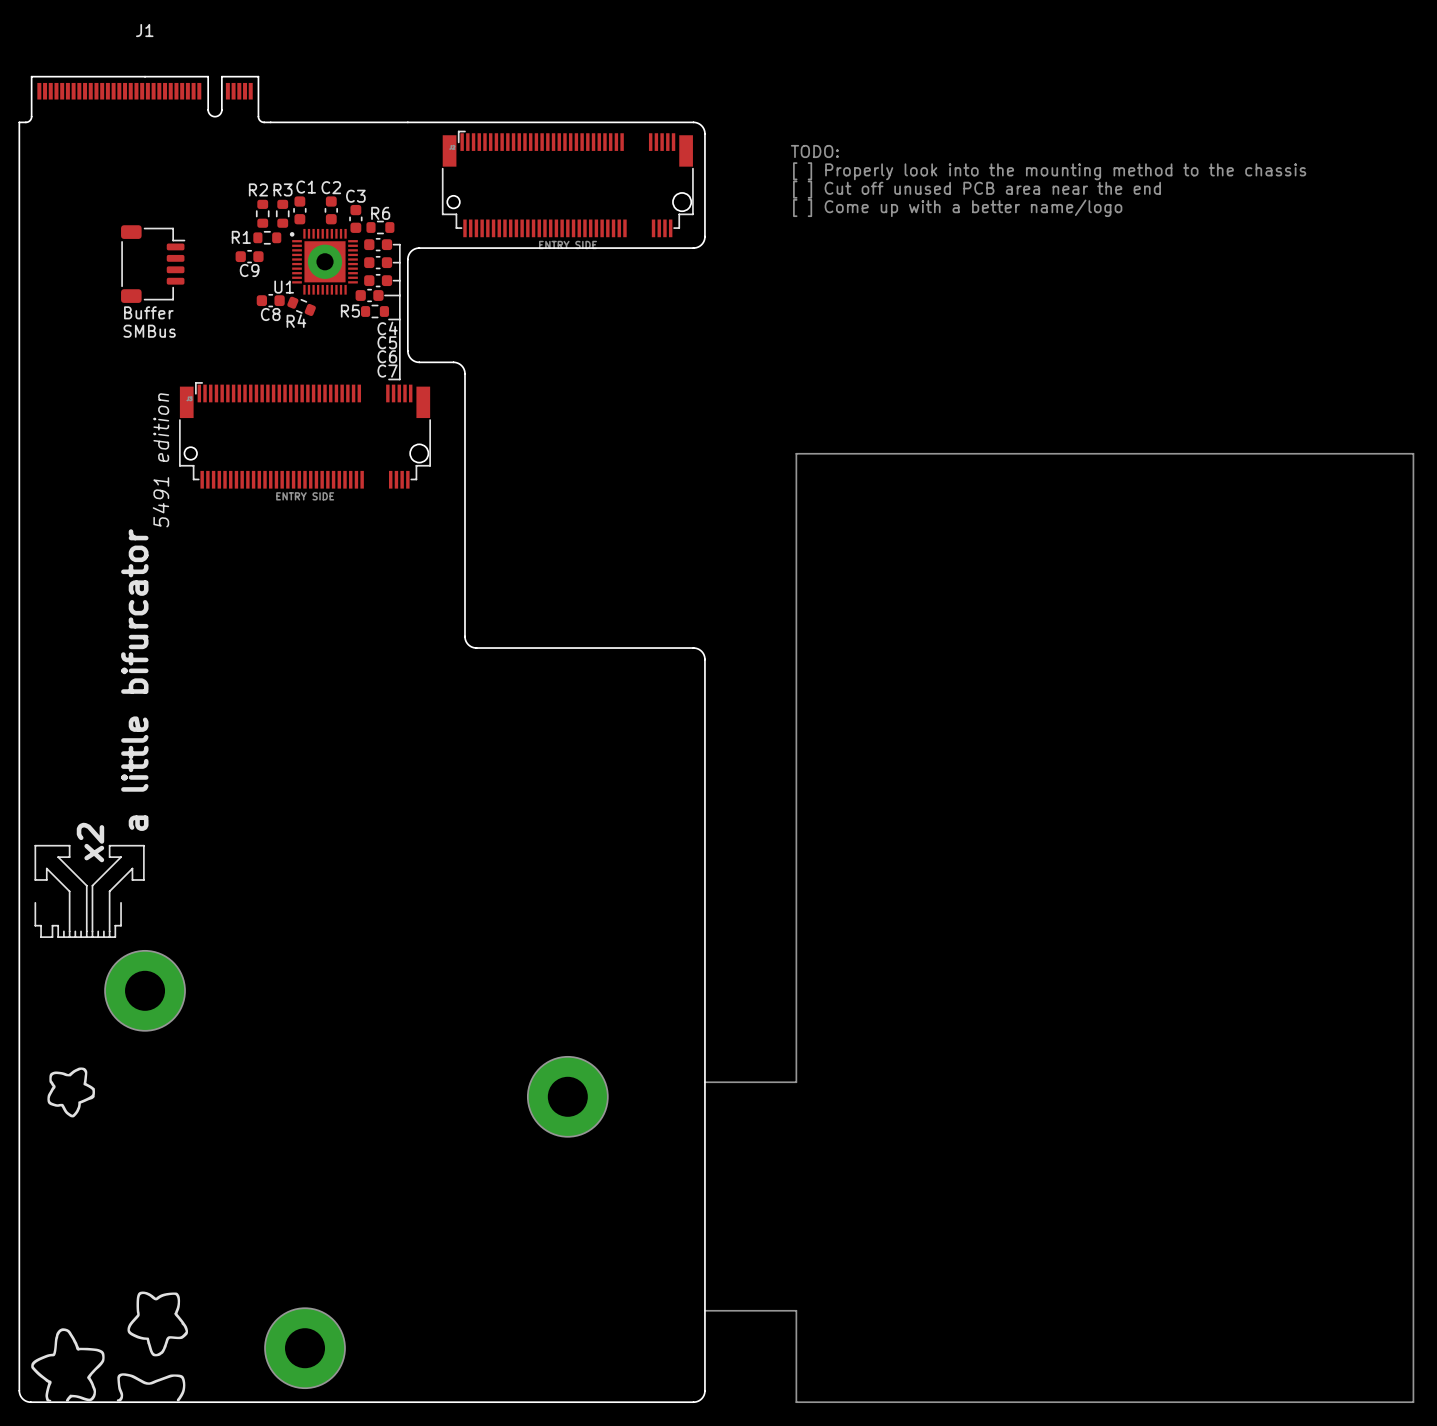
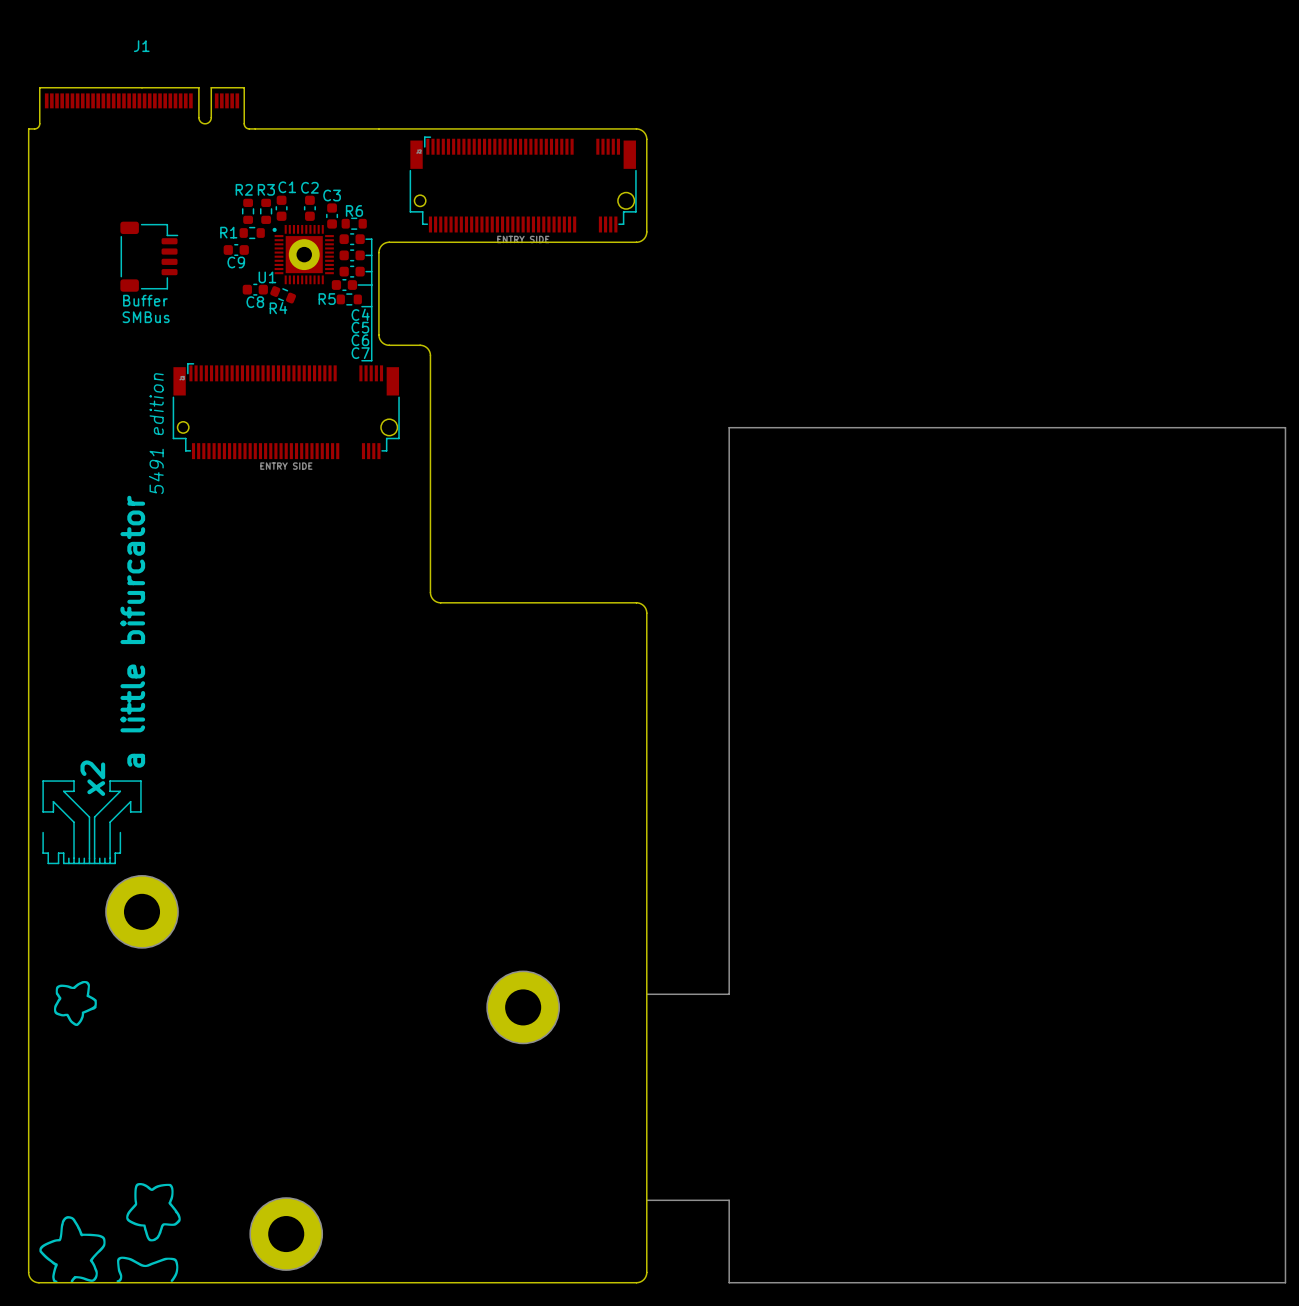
text: TODO: (814, 151) -> none
text: [ ] Properly look into the mounting method to the chassis (1049, 171) -> none
text: [ ] Cut off unused PCB area near the end (977, 189) -> none
text: [ ] Come up with a better name/logo (957, 208) -> none

